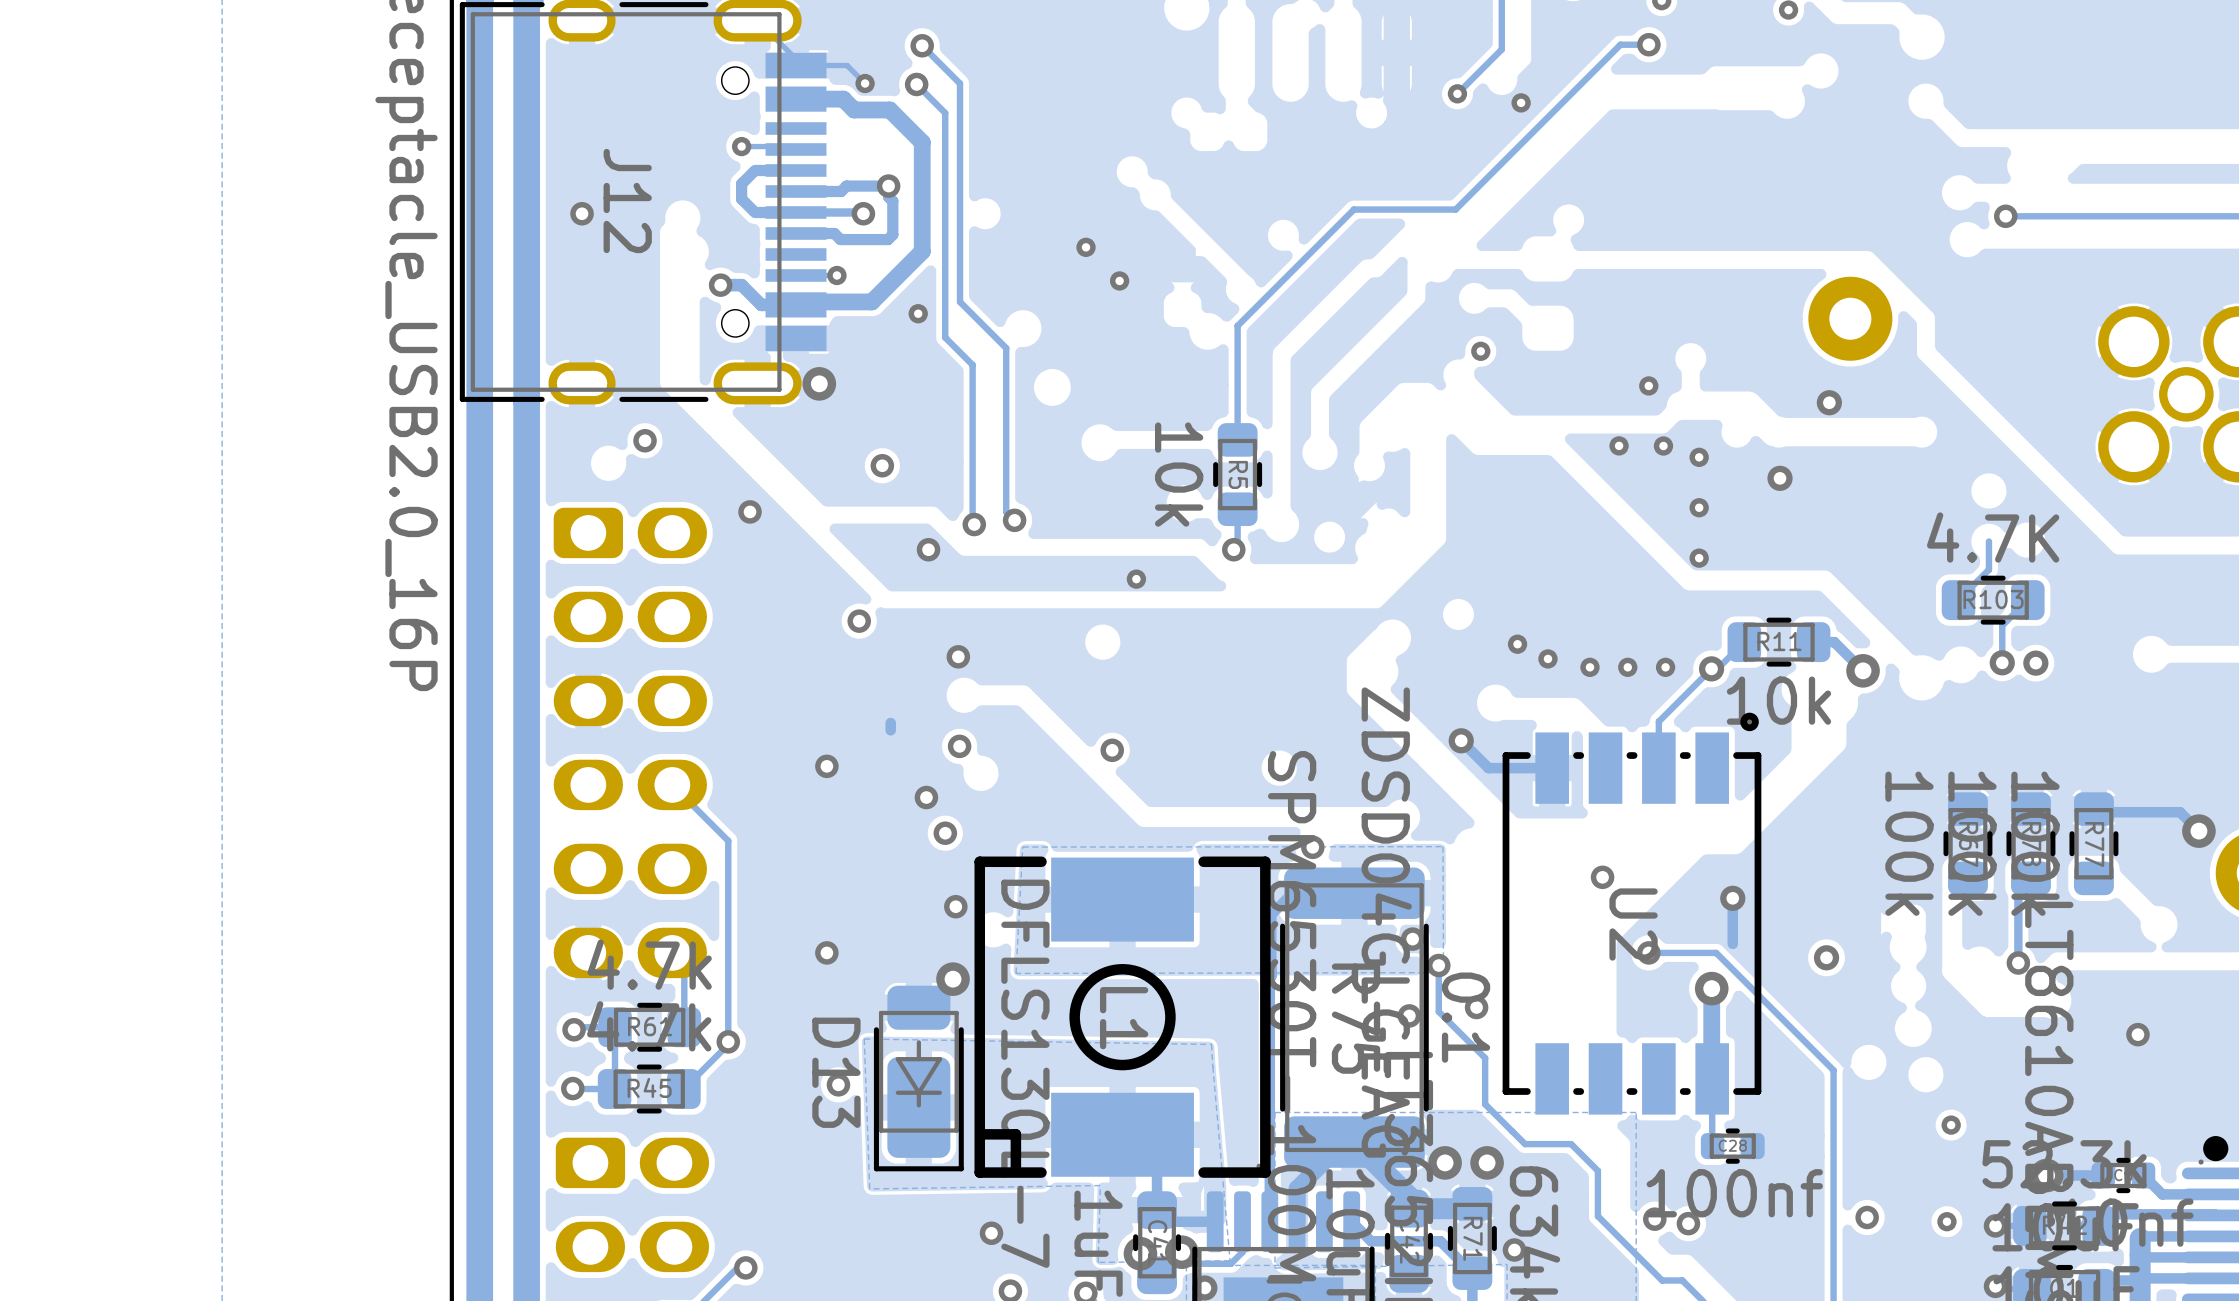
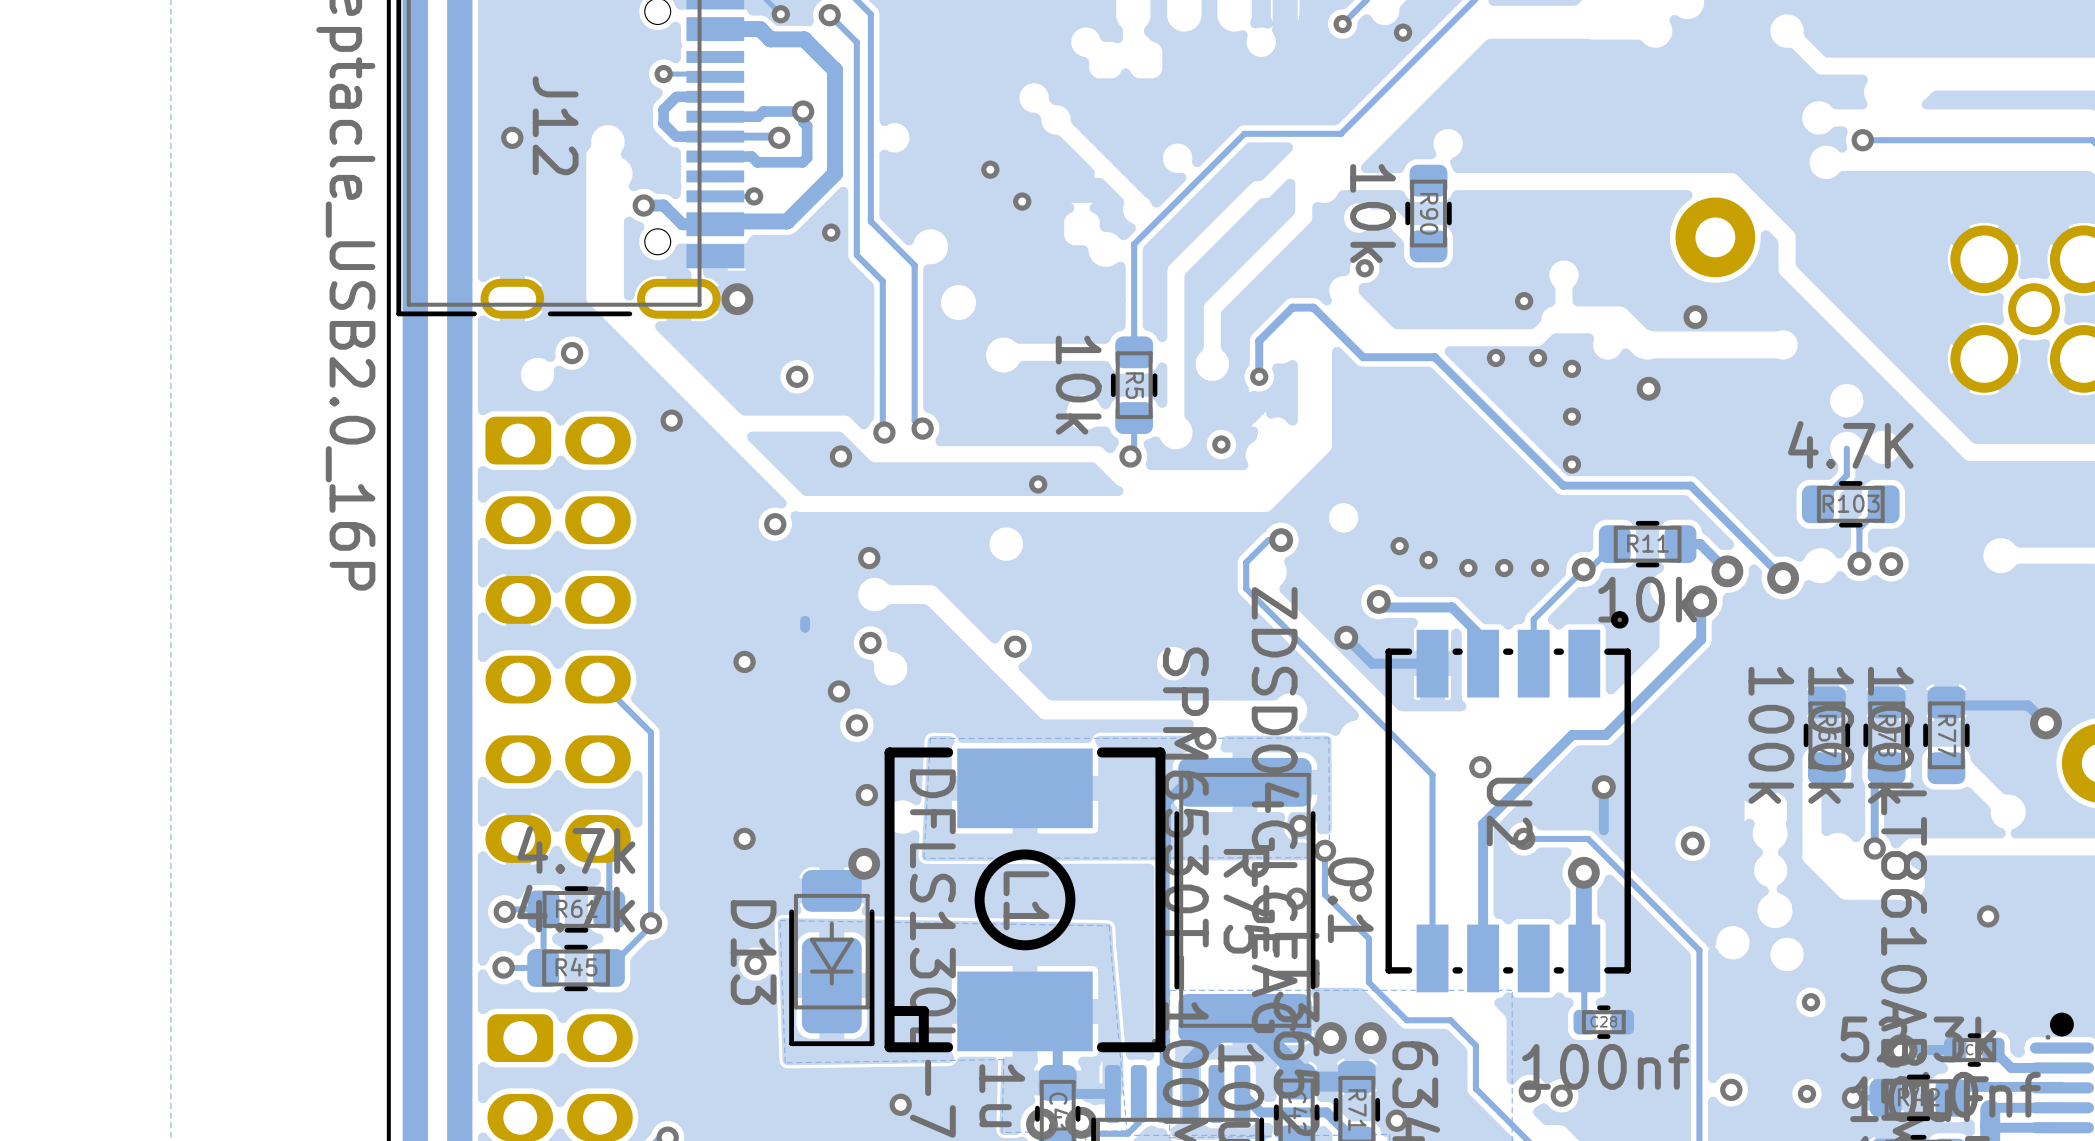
R90: none -> 10k (1428, 213)
track: none -> (1259, 376) (1259, 340) (1292, 307) (1313, 307) (1363, 357) (1434, 357) (1563, 485) (1690, 485) (1783, 578)
via: none -> (1259, 376)
via: none -> (1221, 444)
track: none -> (1281, 540) (1268, 540) (1246, 562) (1246, 588) (1432, 774) (1432, 958)
via: none -> (1281, 540)
via: none -> (1783, 578)
track: none -> (1701, 601) (1701, 639) (1605, 734) (1572, 734) (1483, 824) (1483, 958)
via: none -> (1701, 601)
track: none -> (1378, 601) (1384, 607) (1452, 607) (1483, 638)
via: none -> (1378, 601)

